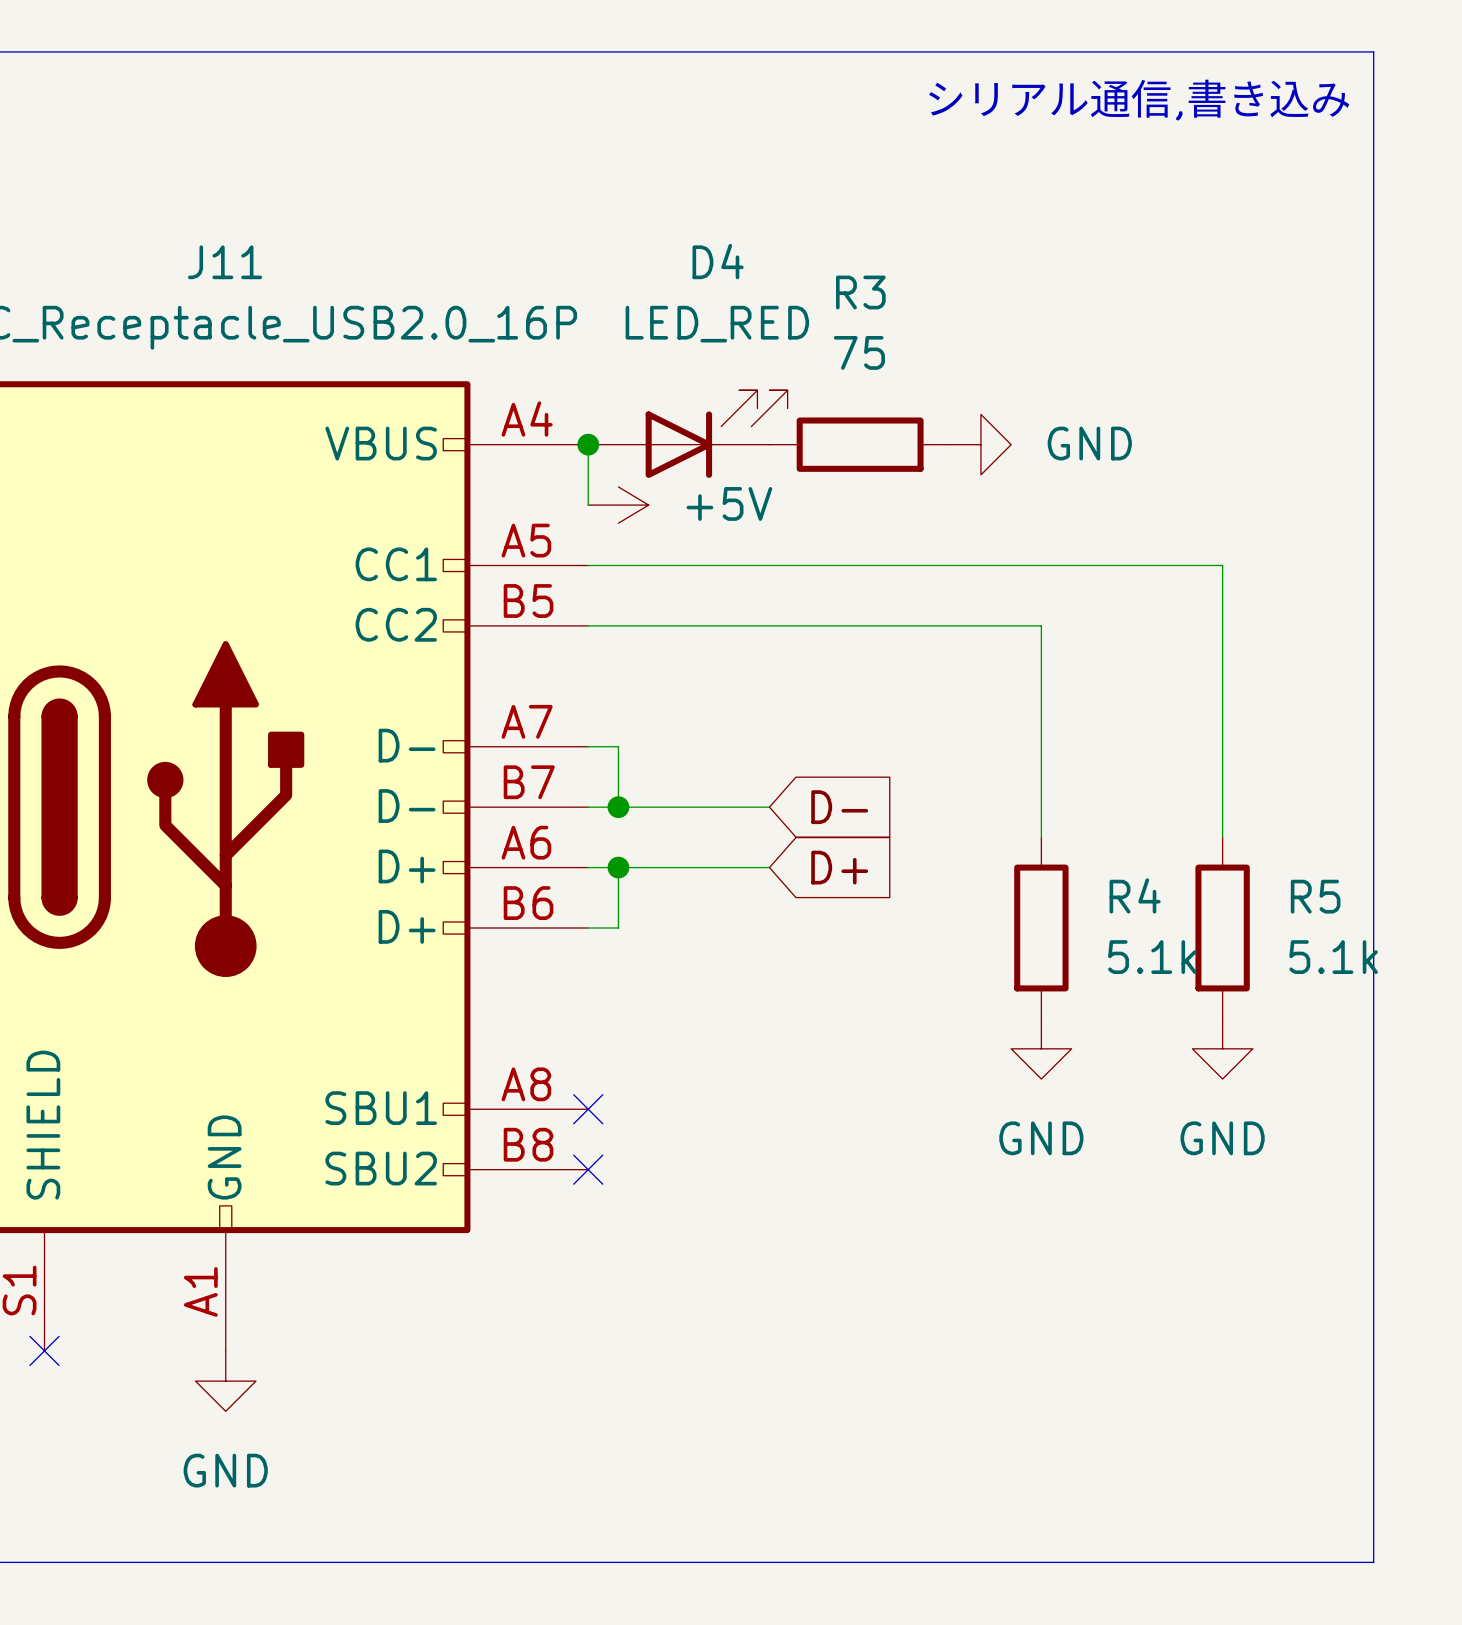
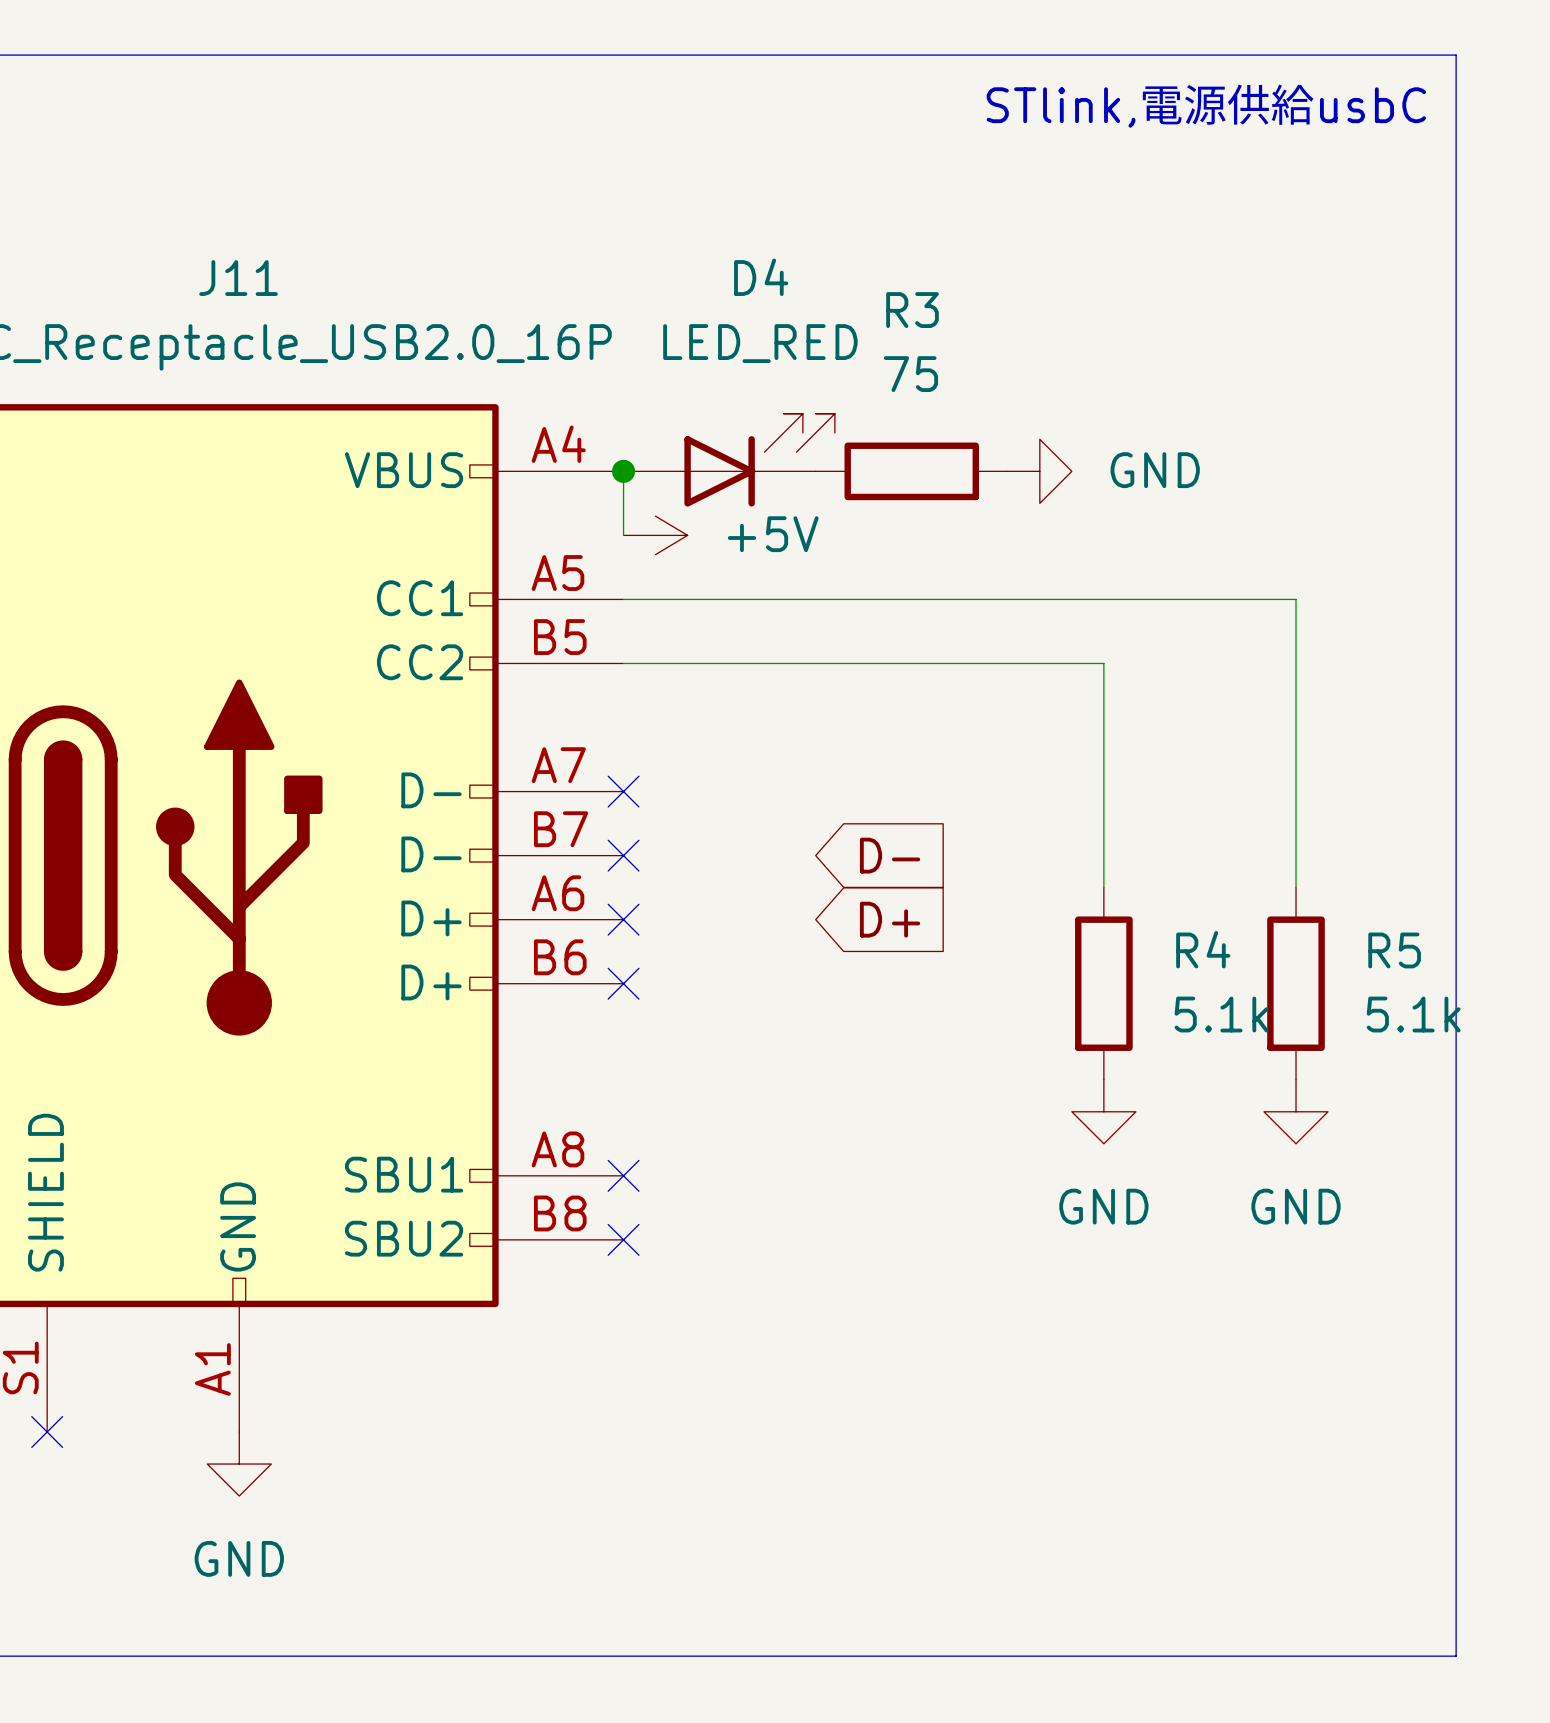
text: シリアル通信,書き込み (1139, 99) -> STlink,電源供給usbC (1206, 105)
wire: (588, 746) (618, 746) (618, 807) -> none
no-connect mark: none -> (623, 791)
wire: (588, 807) (769, 807) -> none
no-connect mark: none -> (623, 855)
junction: (618, 807) -> none
wire: (588, 867) (769, 867) -> none
no-connect mark: none -> (623, 919)
wire: (618, 867) (618, 928) (588, 928) -> none
junction: (618, 867) -> none
no-connect mark: none -> (623, 983)

